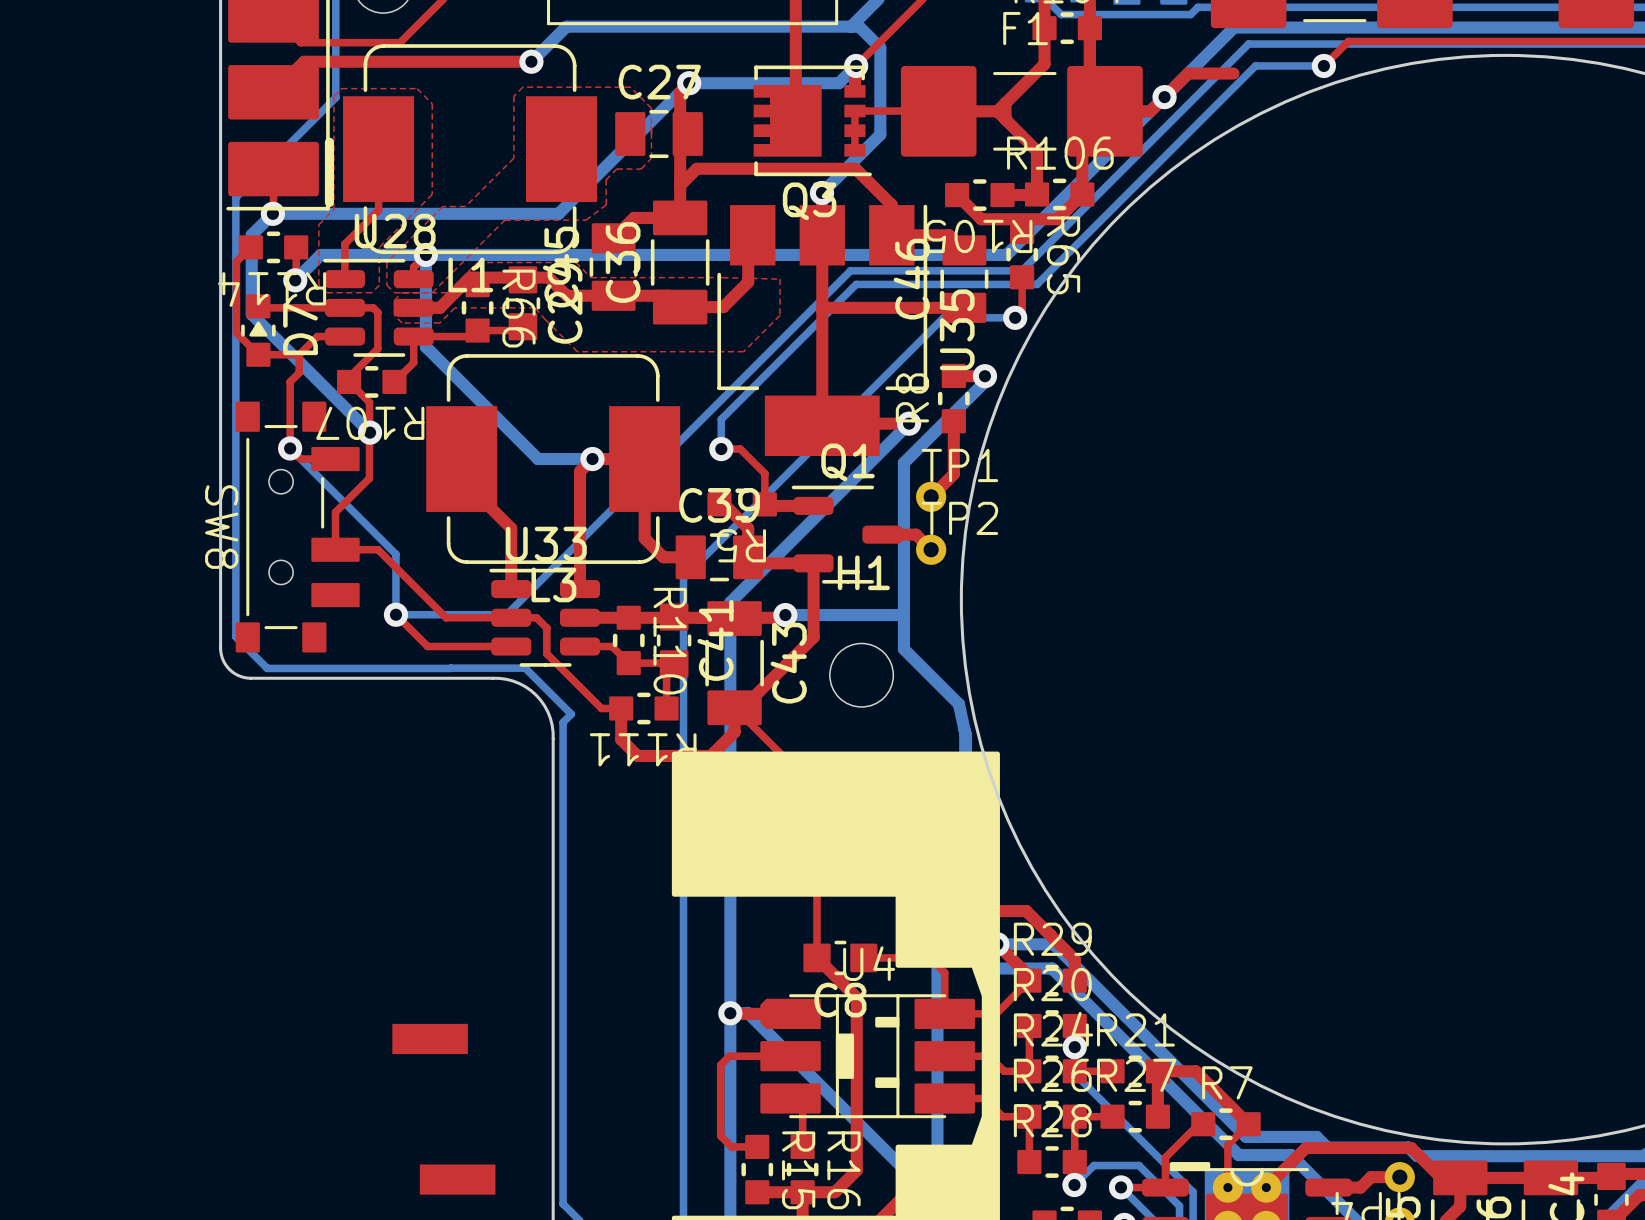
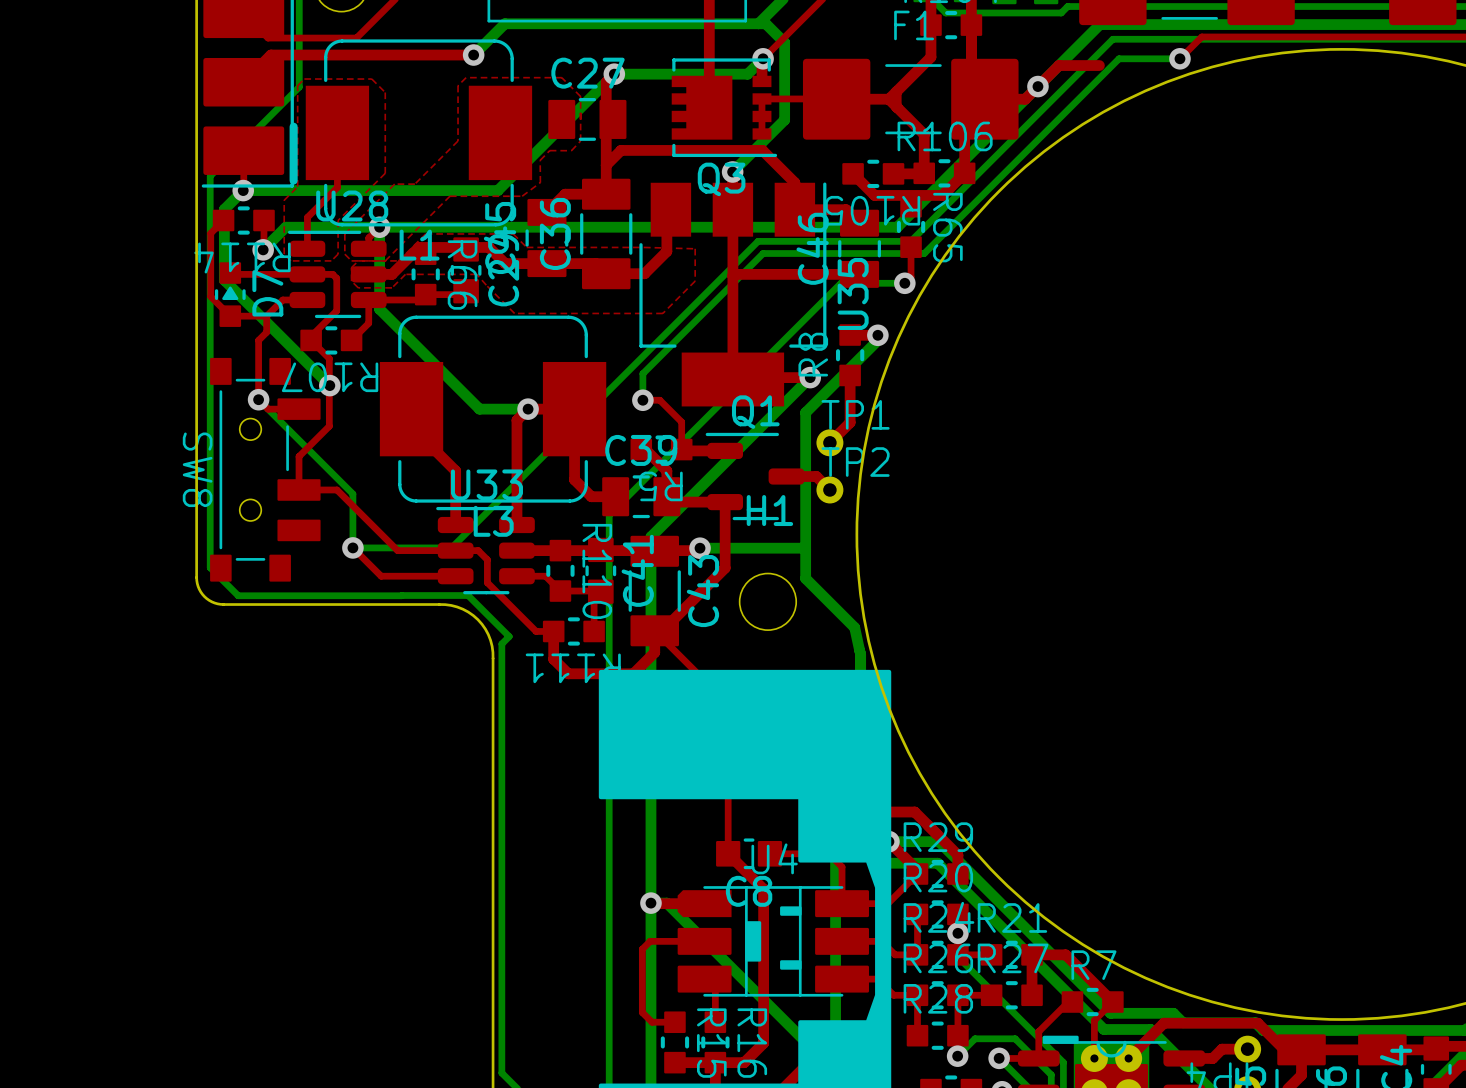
part: (430, 1038) -> none
part: (457, 1179) -> none

